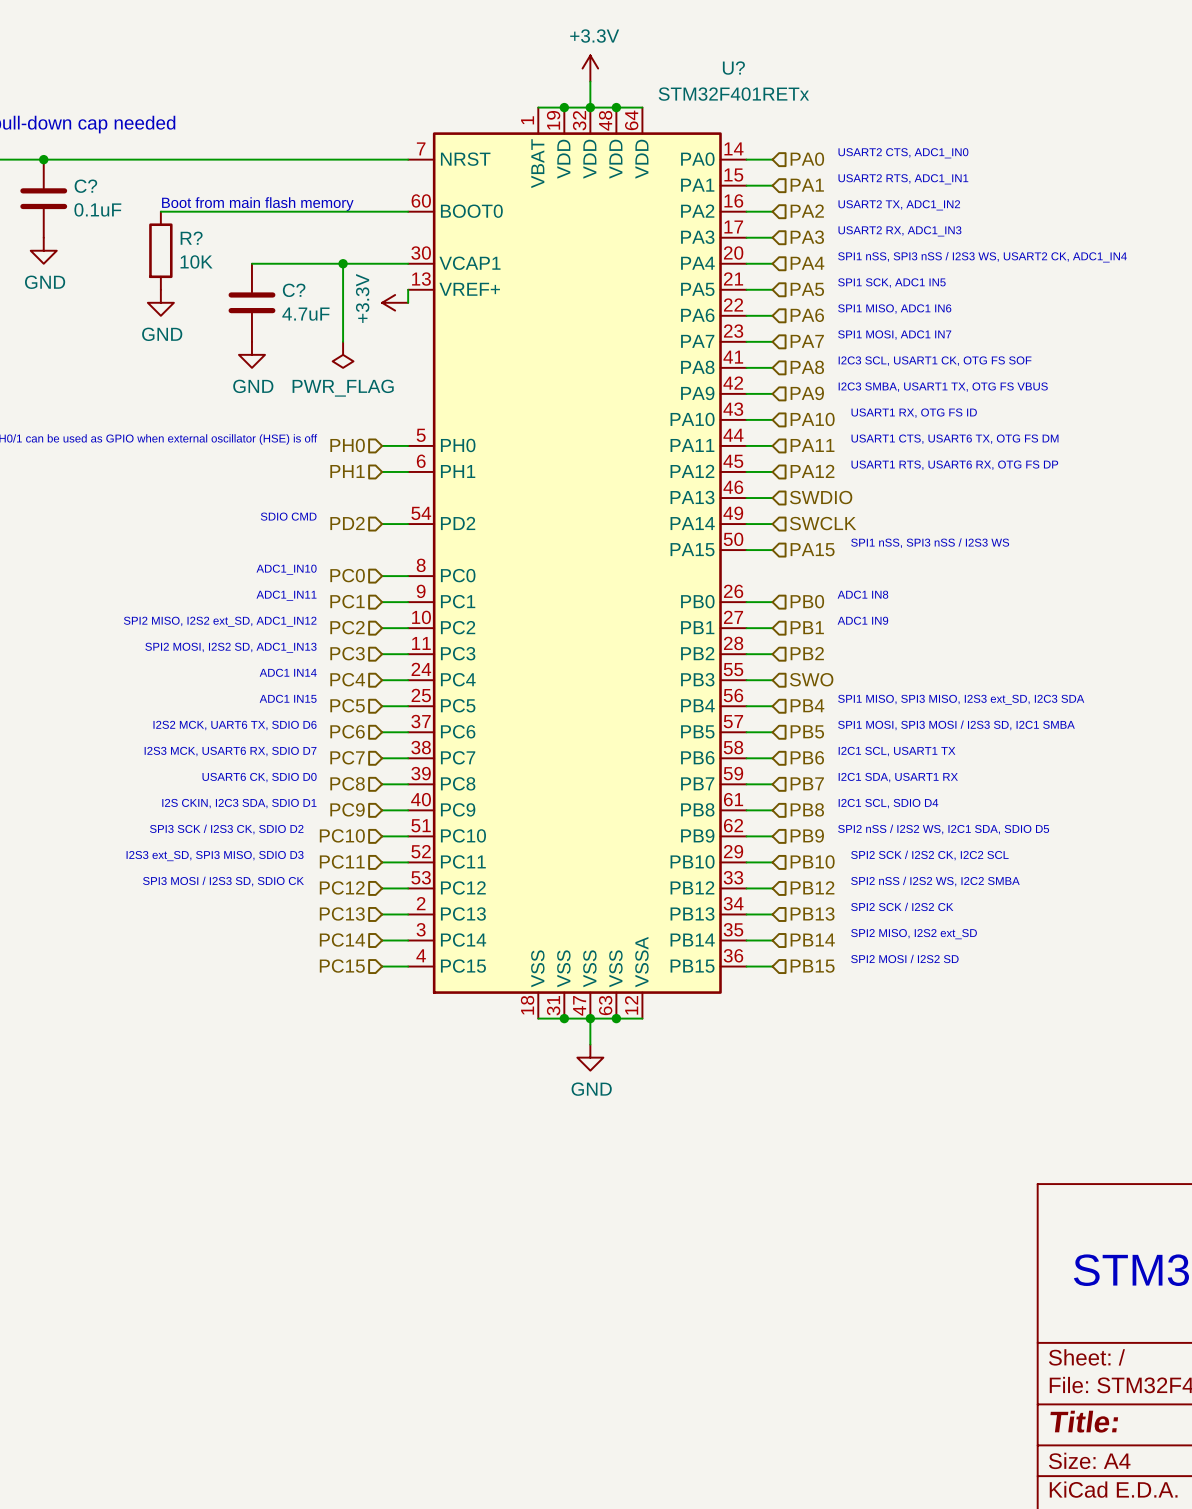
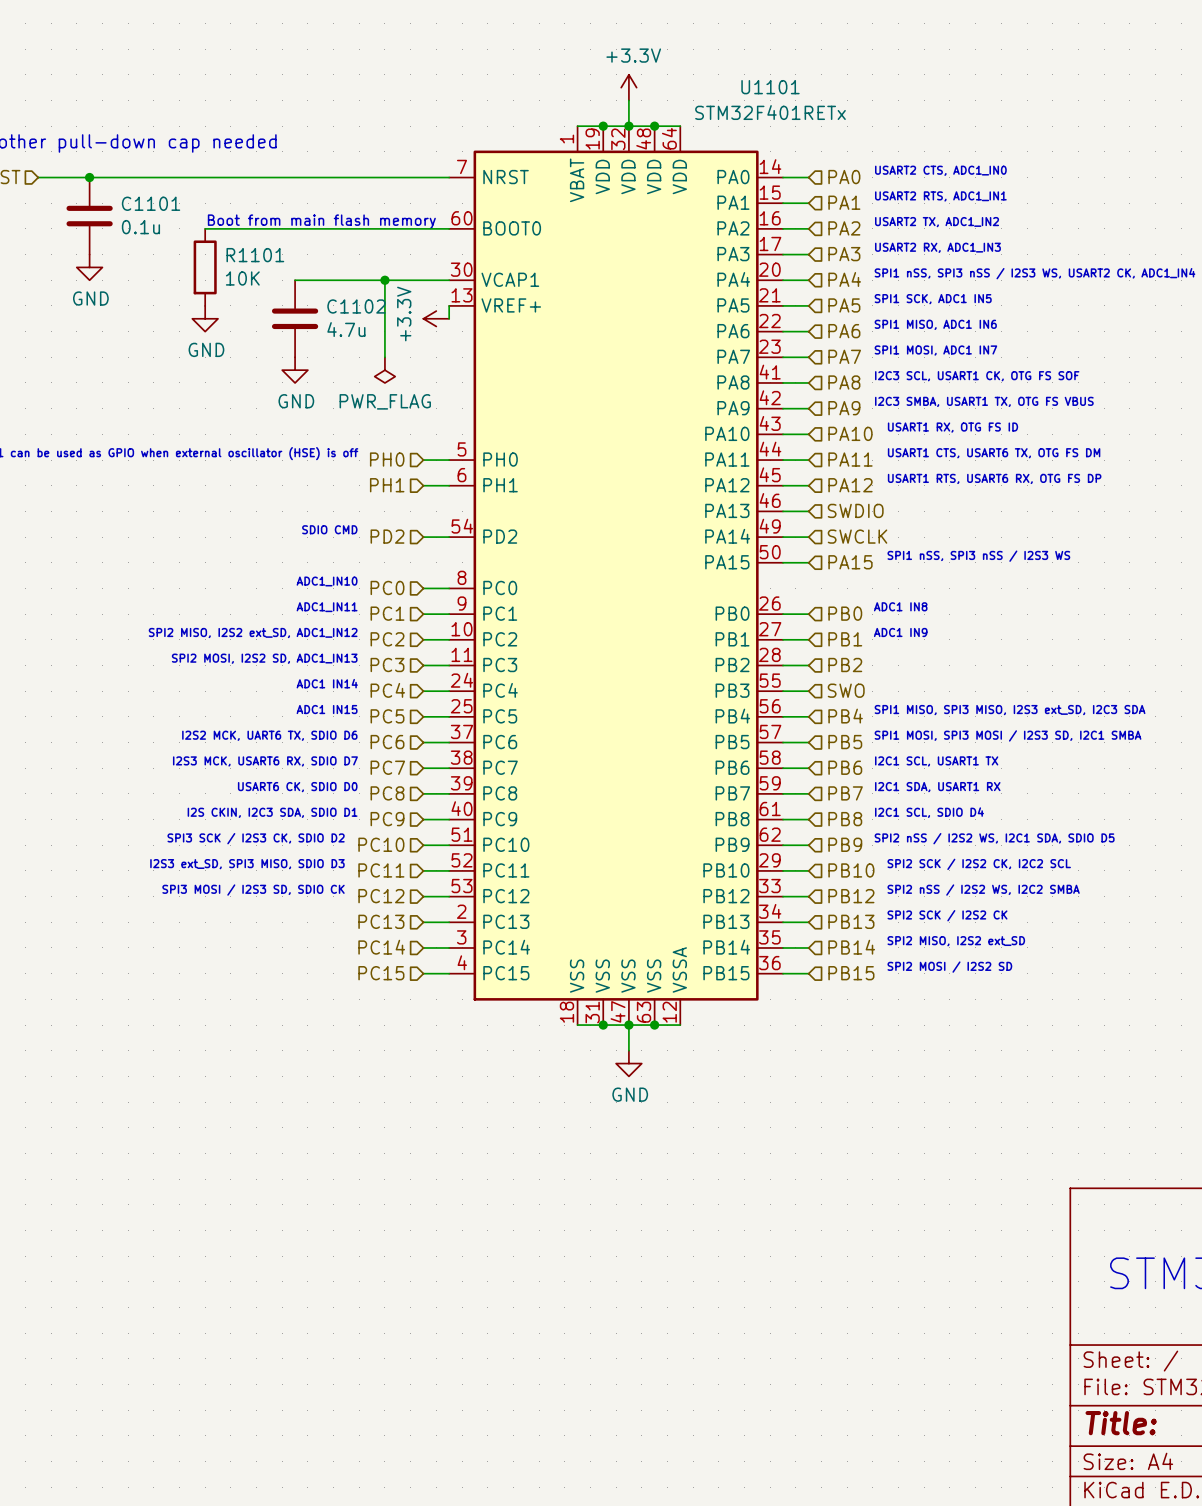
U? name: U? (733, 68) -> U1101 (770, 87)
C? name: C? (85, 186) -> C1101 (151, 203)
C? value: 0.1uF (97, 209) -> 0.1u (140, 227)
R? name: R? (191, 238) -> R1101 (255, 255)
C? name: C? (294, 290) -> C1102 (356, 306)
C? value: 4.7uF (305, 314) -> 4.7u (346, 329)

